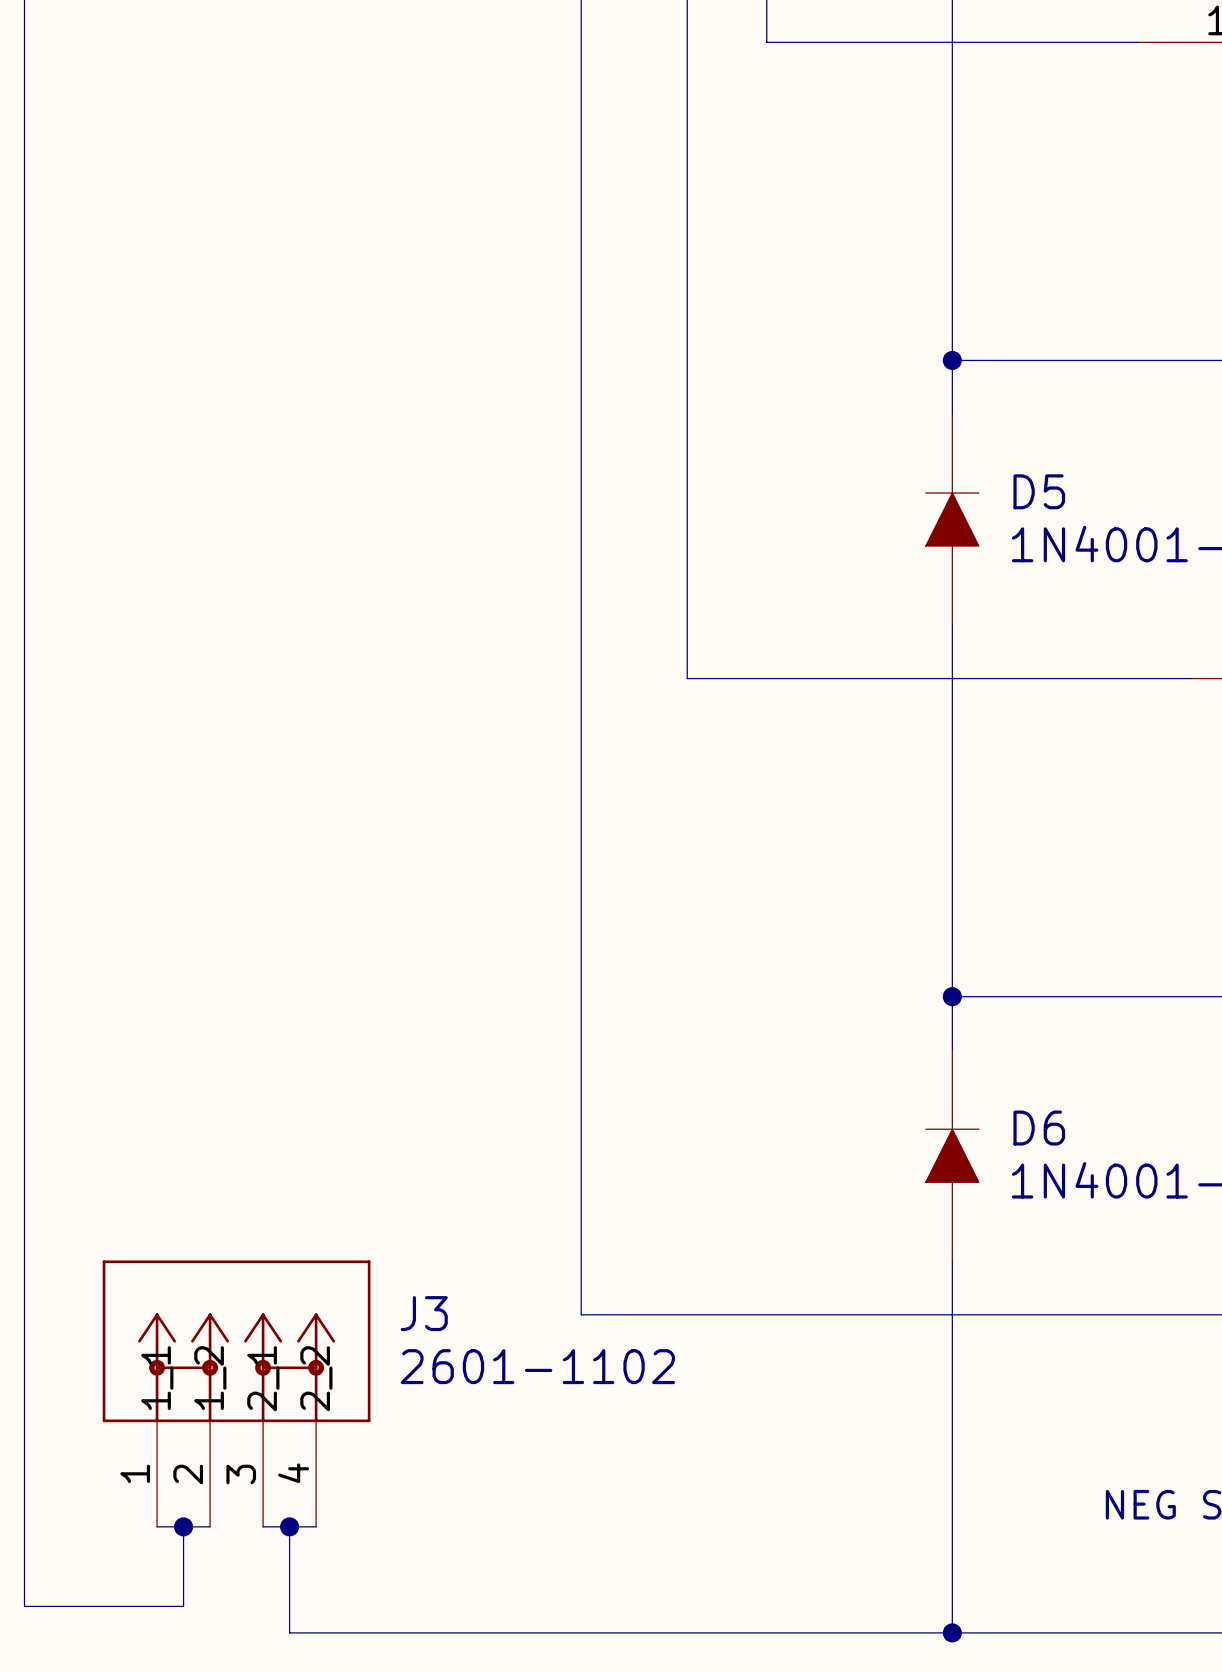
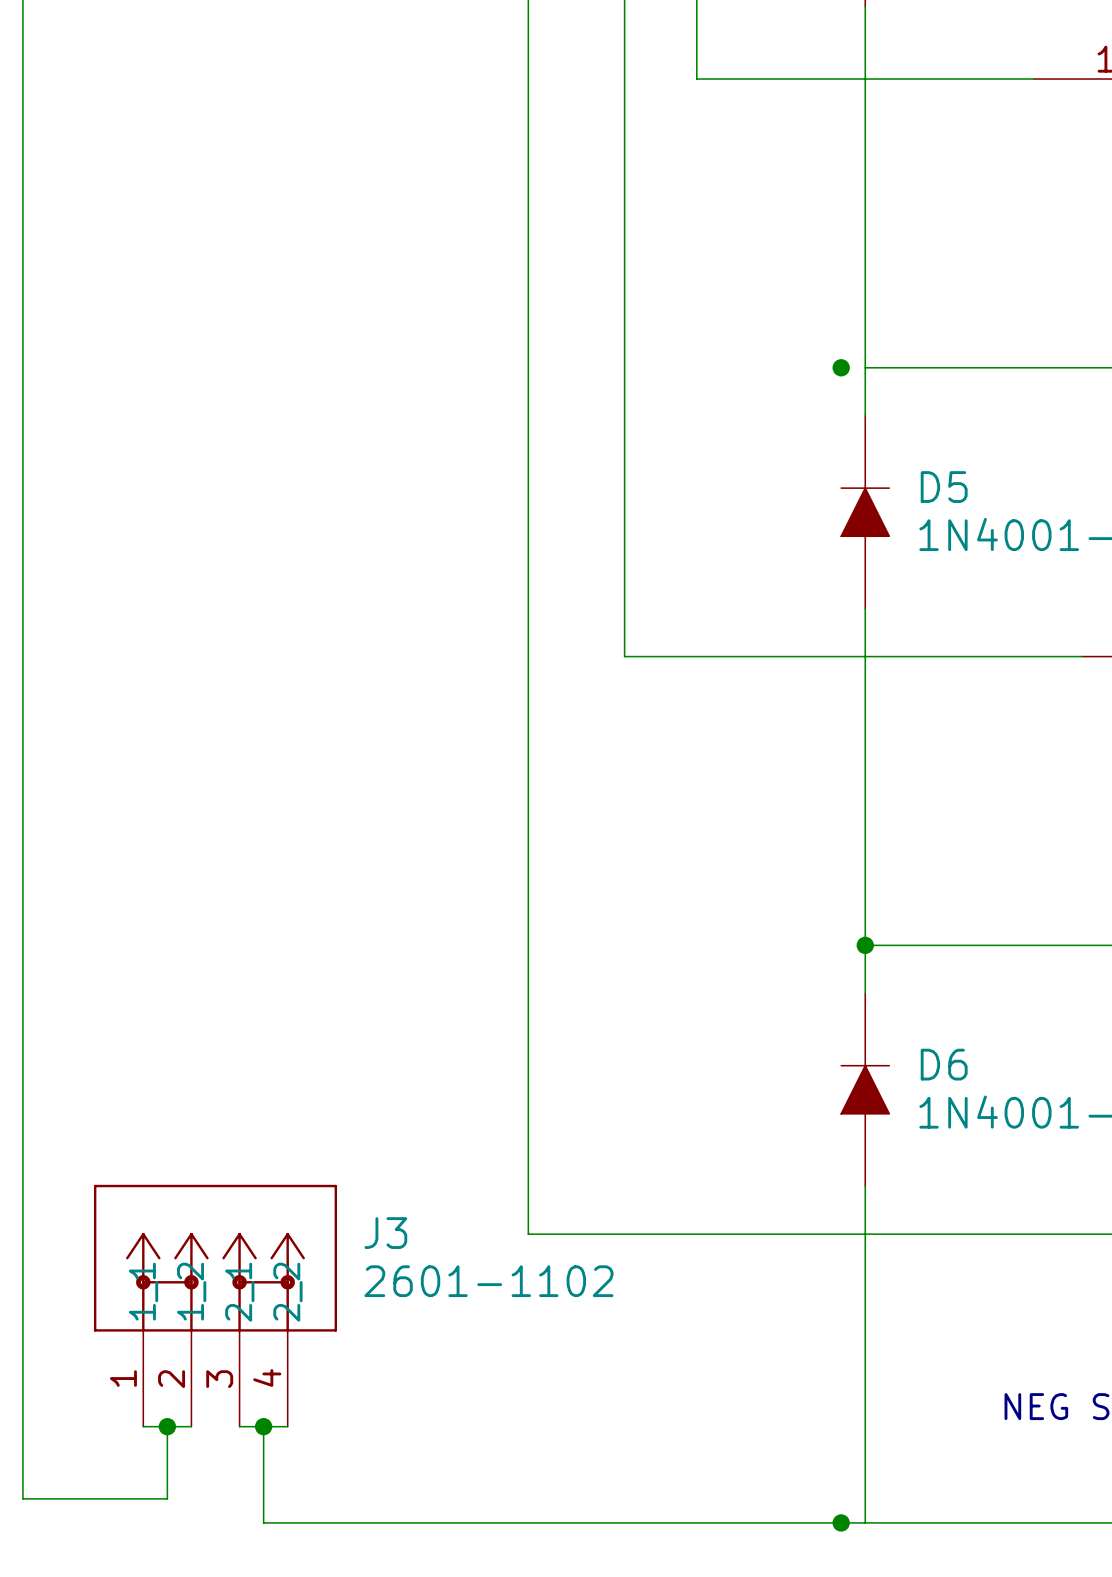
junction position: (952, 360) -> (841, 367)
junction position: (952, 1632) -> (841, 1522)

